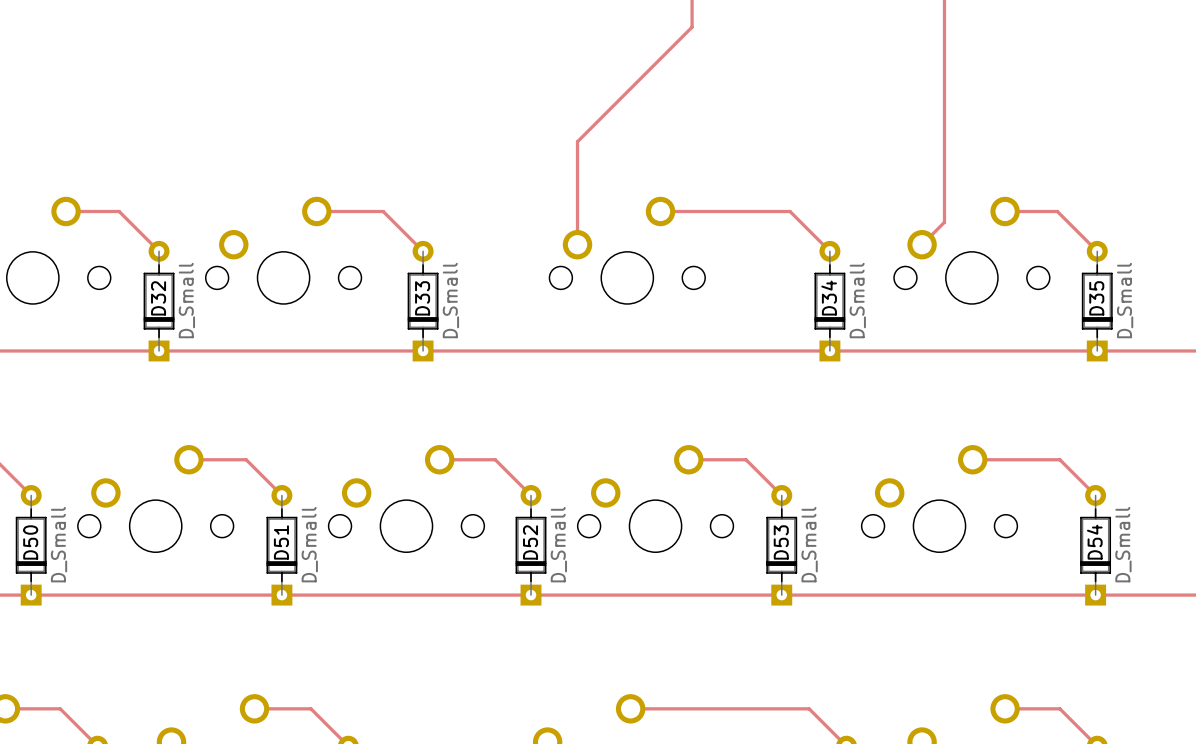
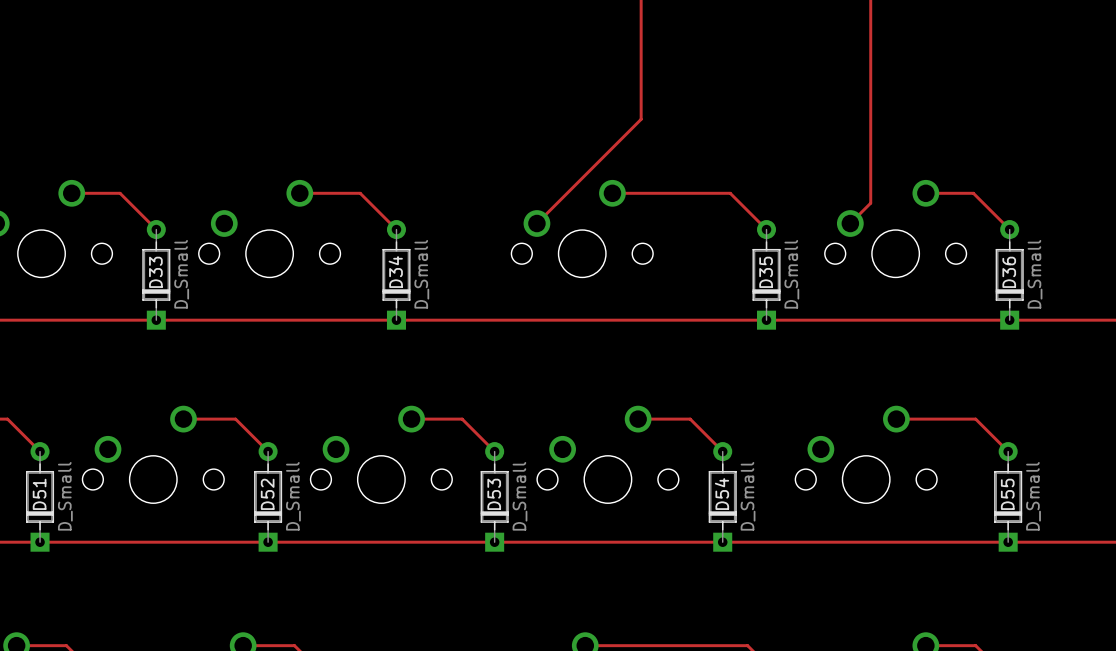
track: (692, 27) (577, 141) (577, 244) -> (641, 25) (641, 119) (536, 223)
D32 name: D32 (158, 298) -> D33 (155, 272)
D33 name: D33 (422, 298) -> D34 (395, 272)
D34 name: D34 (829, 298) -> D35 (766, 272)
D35 name: D35 (1096, 298) -> D36 (1009, 272)
D50 name: D50 (30, 542) -> D51 (39, 494)
D51 name: D51 (281, 542) -> D52 (267, 494)
D52 name: D52 (530, 542) -> D53 (494, 494)
D53 name: D53 (781, 542) -> D54 (721, 494)
D54 name: D54 (1094, 542) -> D55 (1007, 494)

